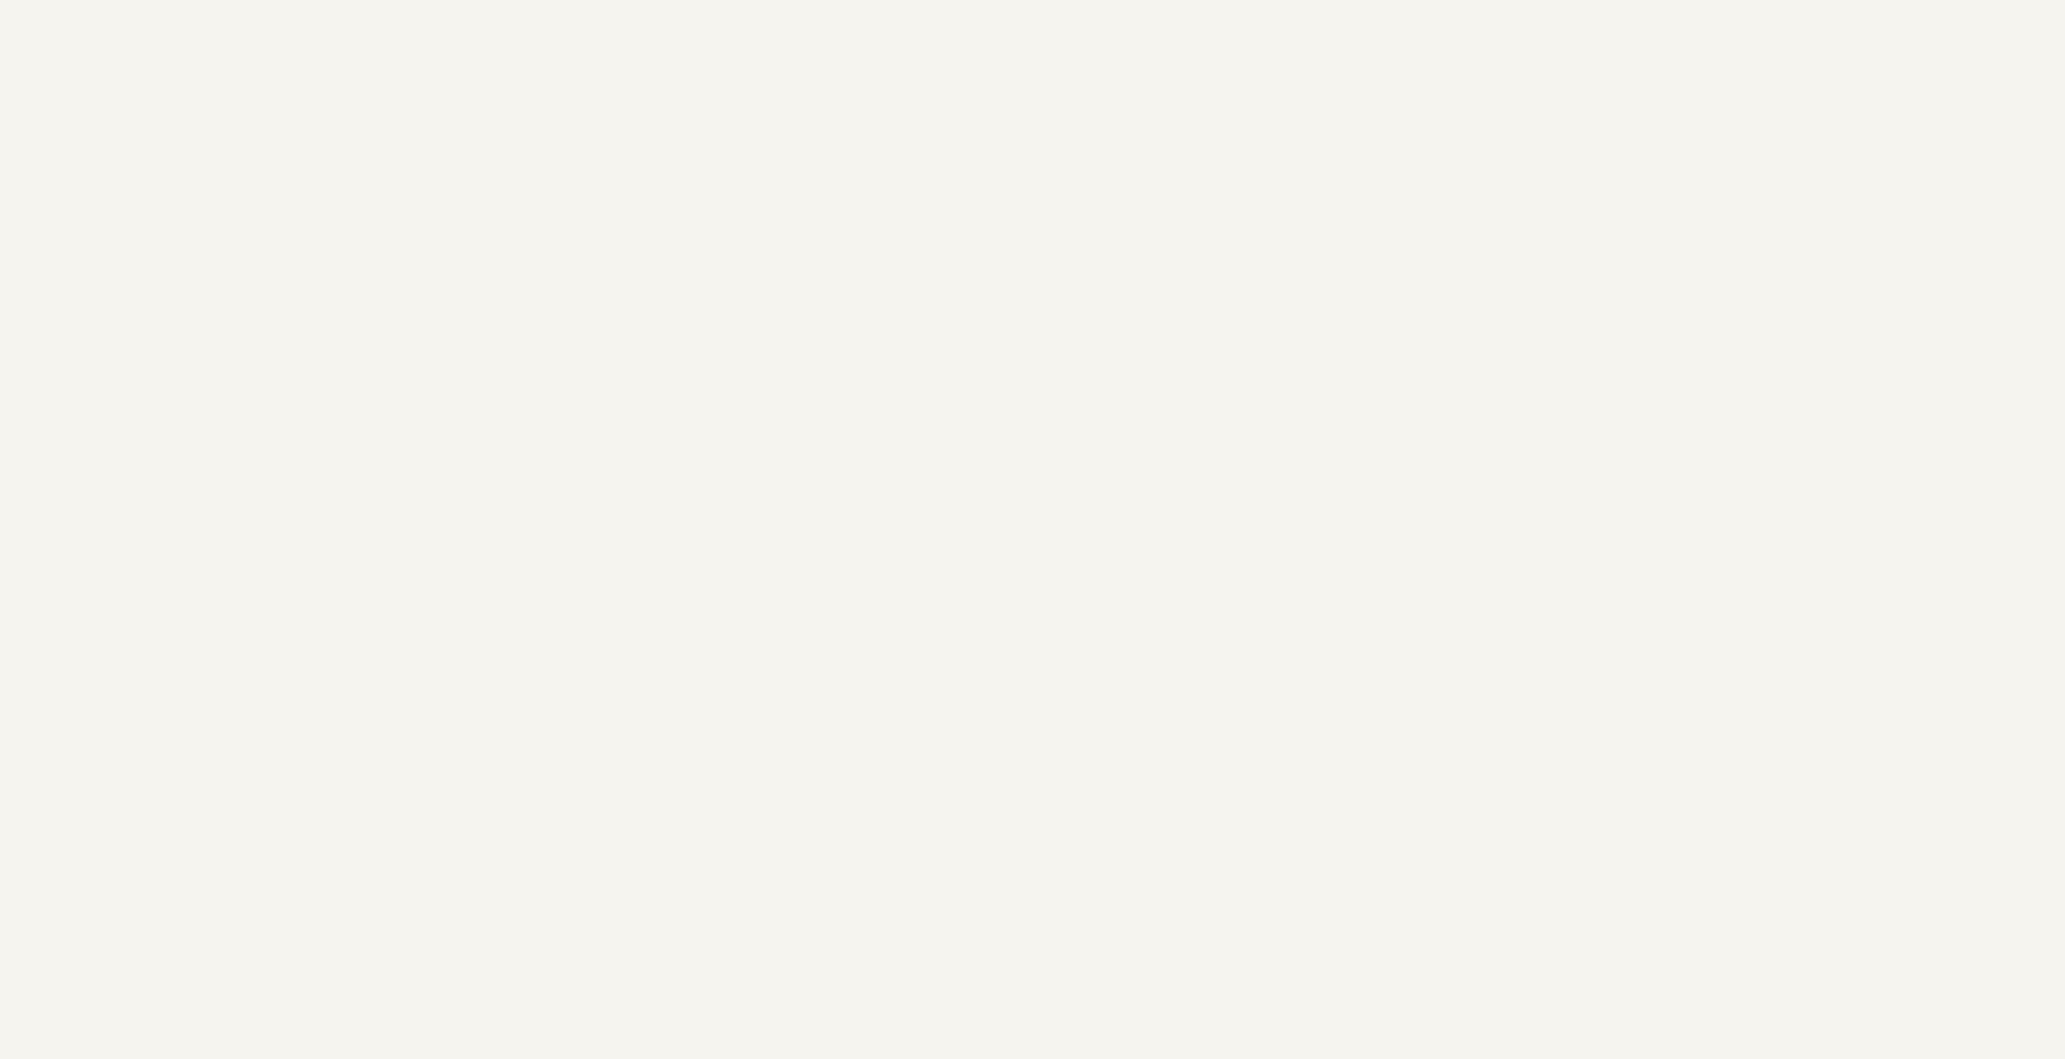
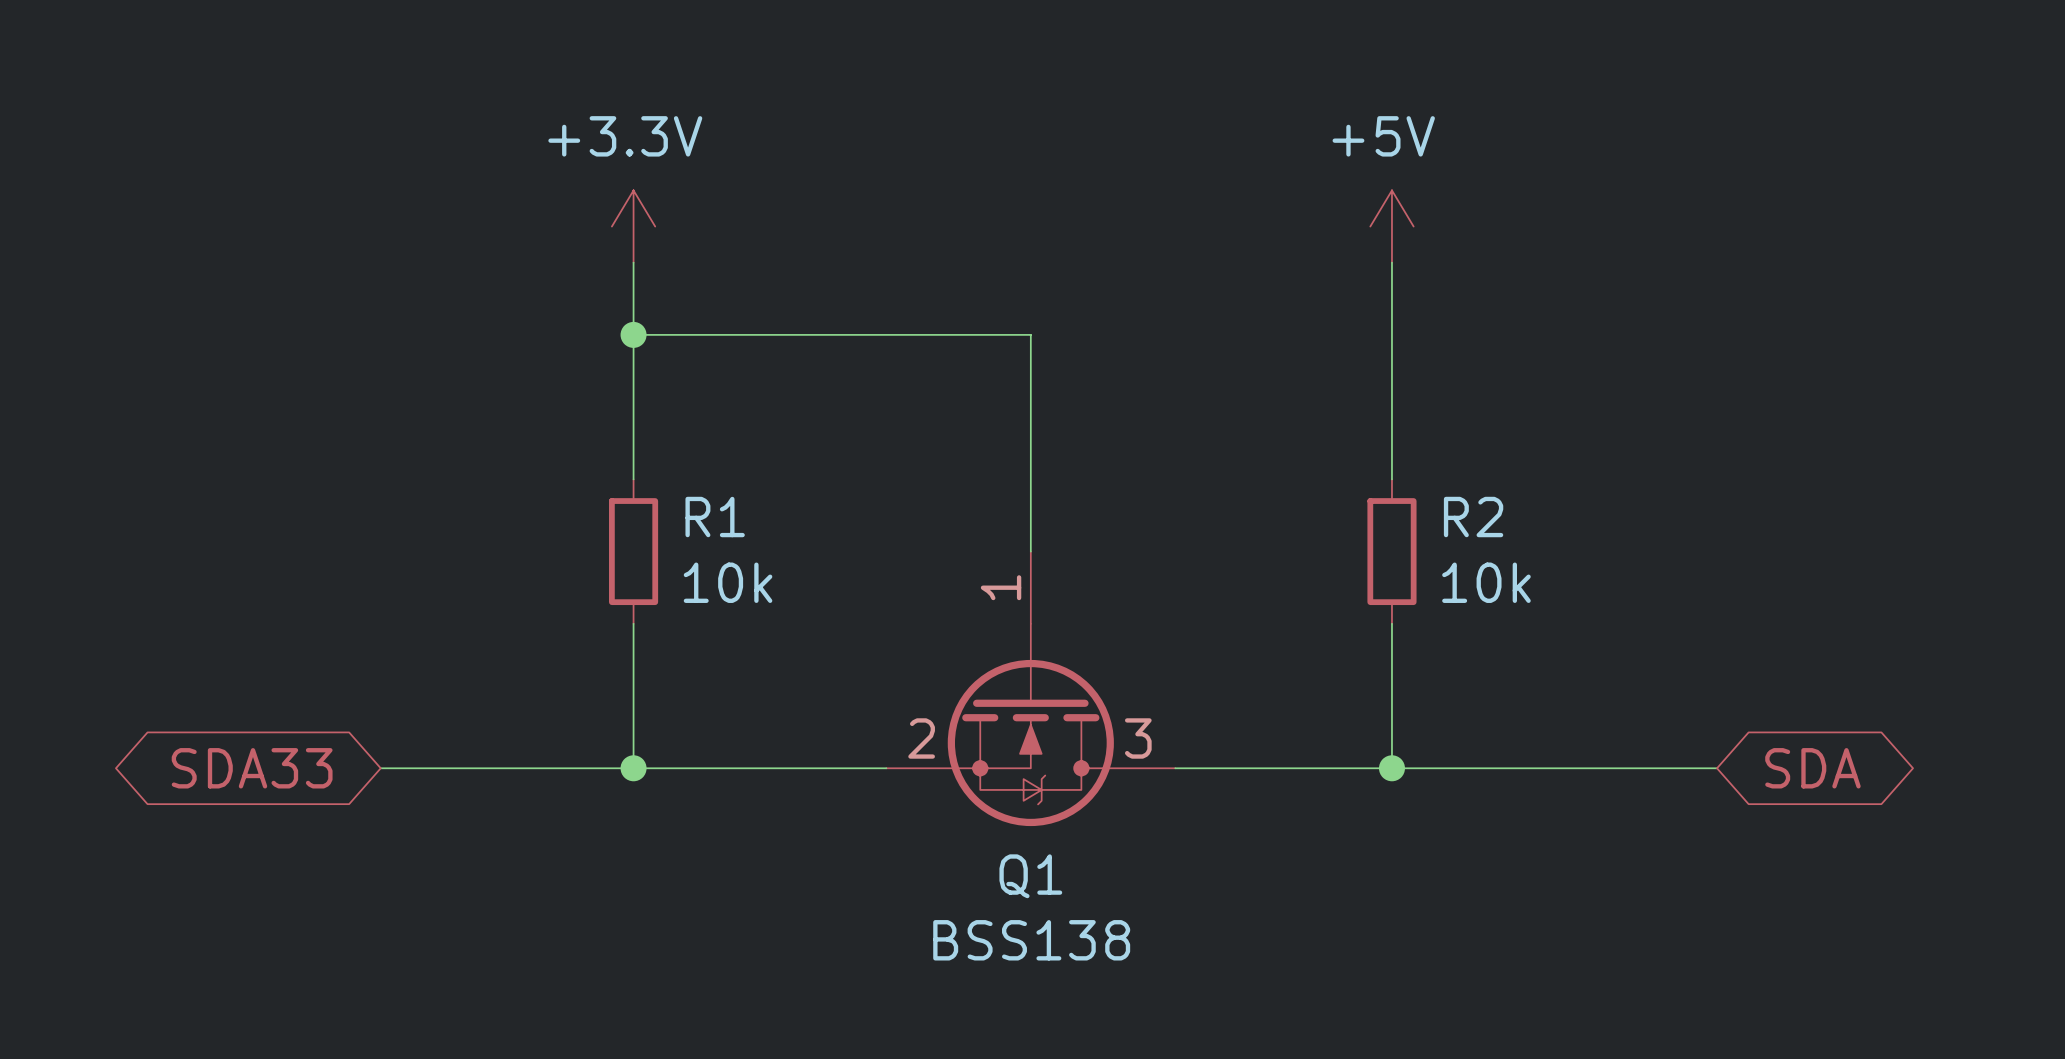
power symbol: none -> +3.3V (633, 226)
power symbol: none -> +5V (1391, 226)
wire: none -> (633, 262) (633, 479)
wire: none -> (1391, 262) (1391, 479)
wire: none -> (633, 334) (1030, 334) (1030, 551)
junction: none -> (633, 334)
R1: none -> 10k (633, 551)
R2: none -> 10k (1391, 551)
wire: none -> (633, 623) (633, 768)
wire: none -> (1391, 623) (1391, 768)
Q1: none -> BSS138 (1030, 688)
global label: none -> SDA33 (252, 768)
wire: none -> (380, 768) (886, 768)
junction: none -> (633, 768)
wire: none -> (1175, 768) (1717, 768)
junction: none -> (1391, 768)
global label: none -> SDA (1812, 768)

